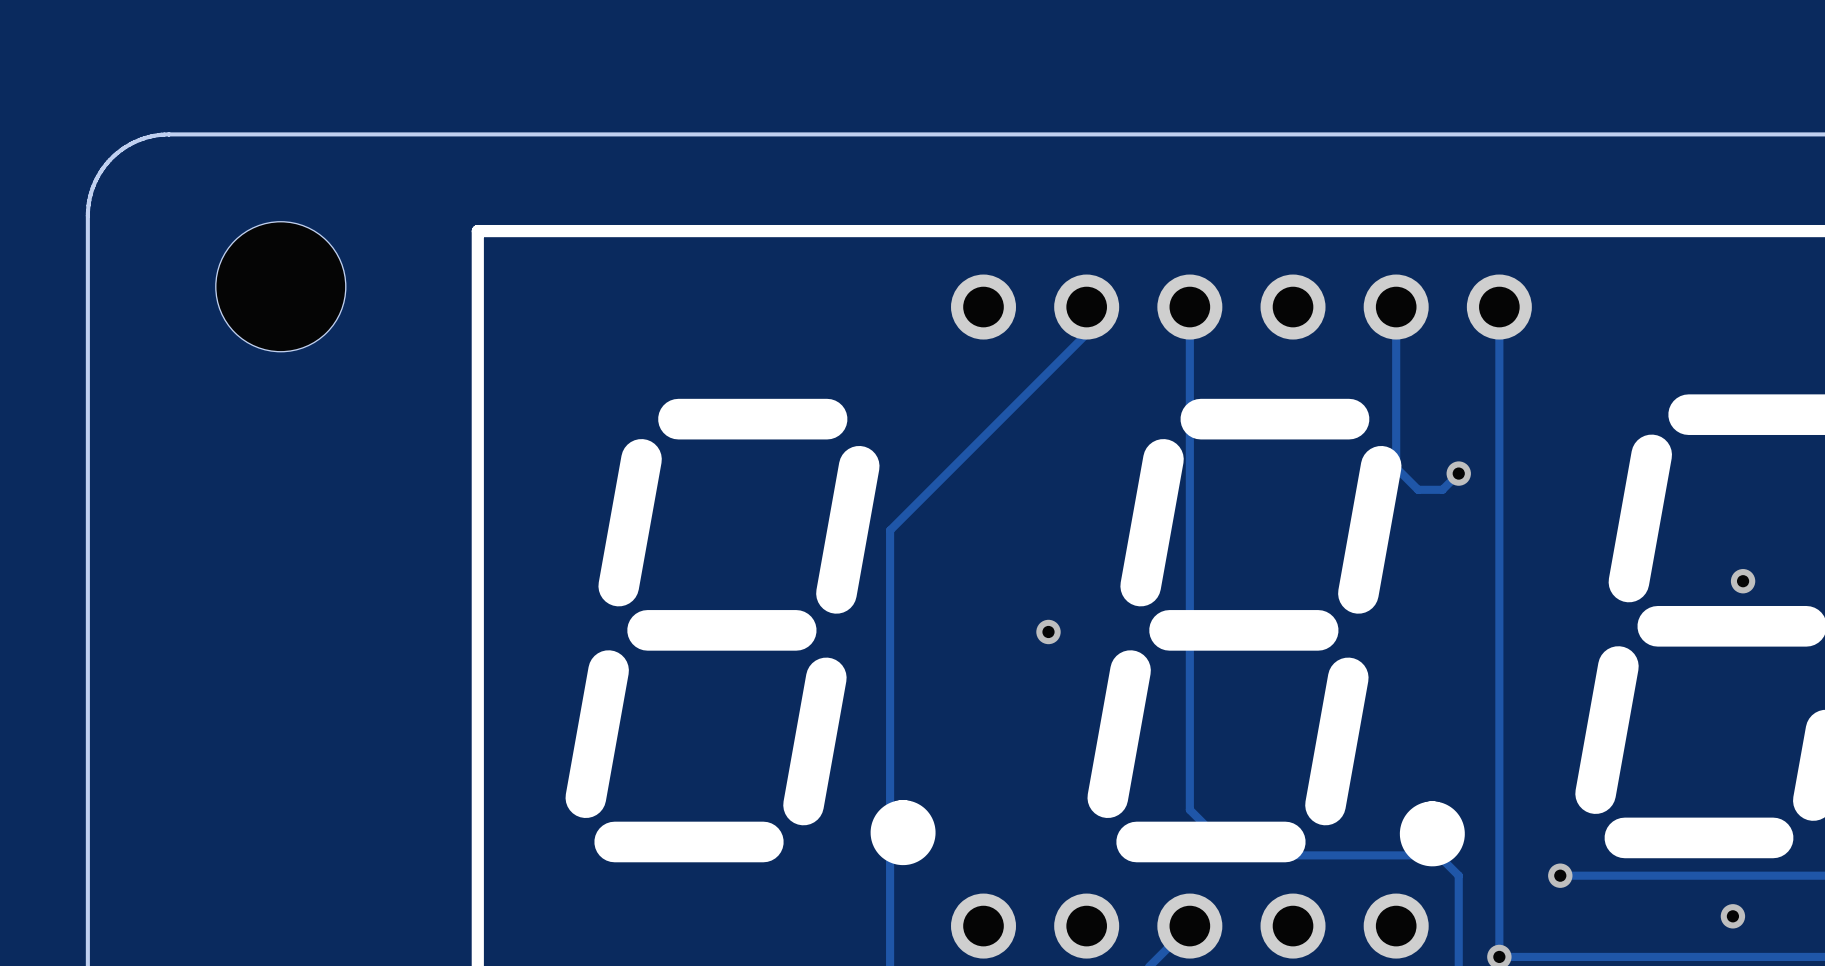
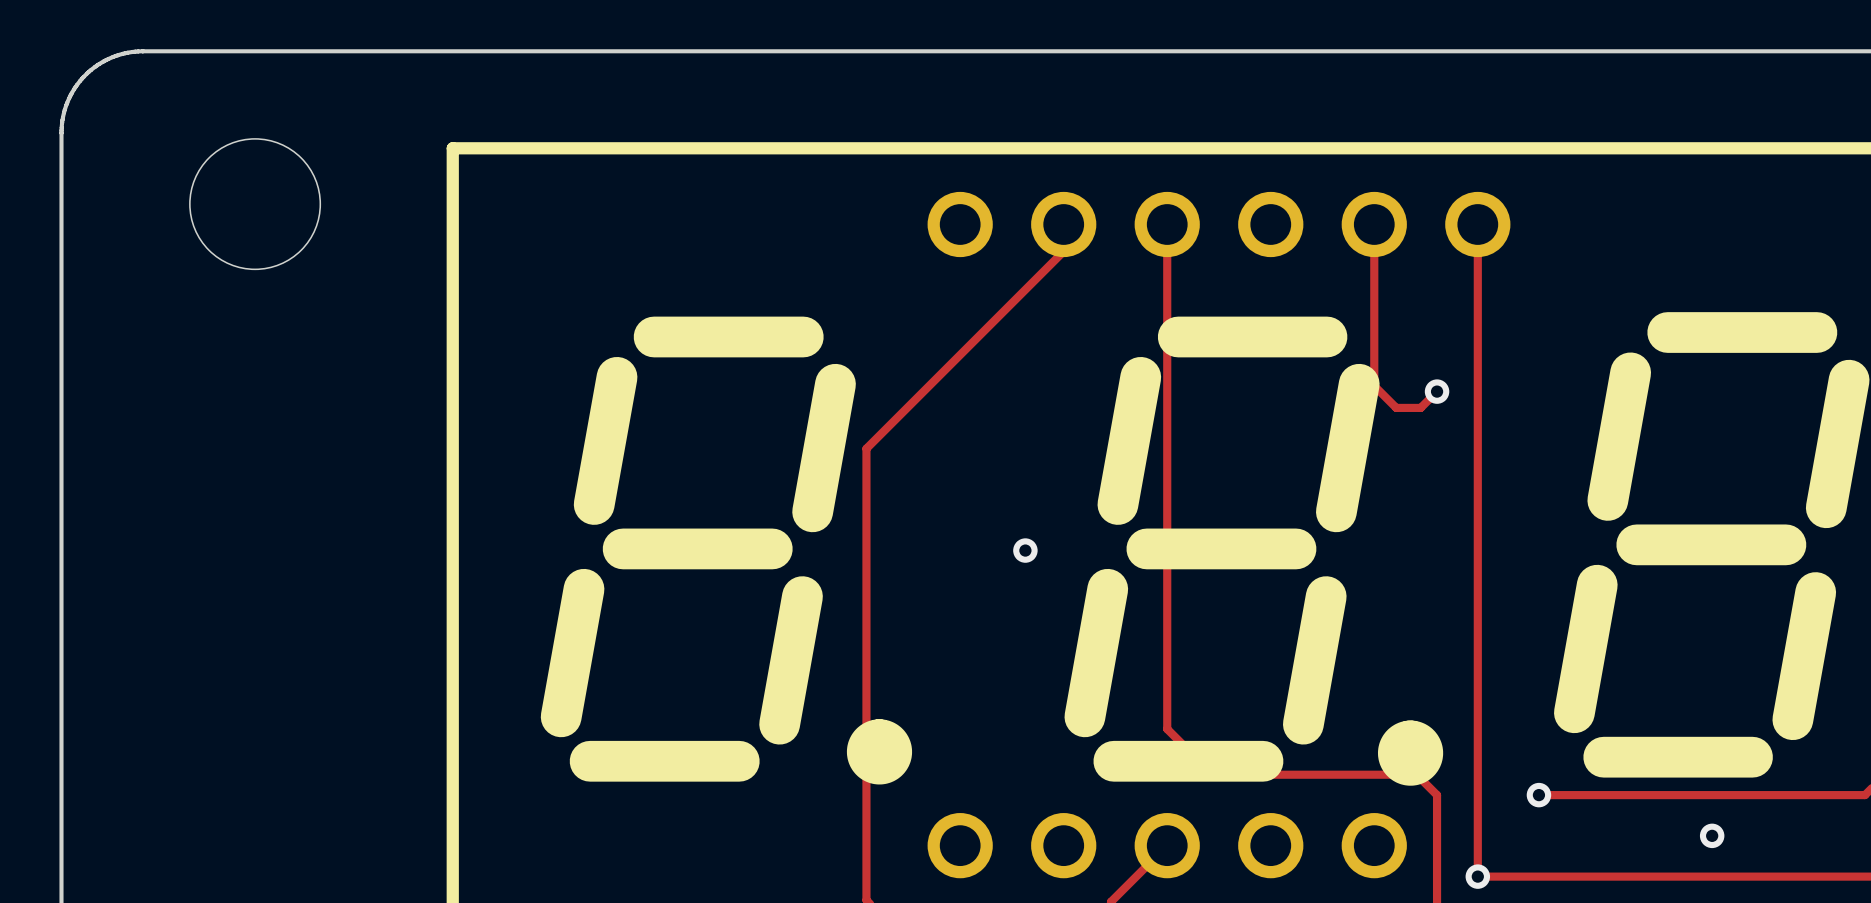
via: (1743, 581) -> none

